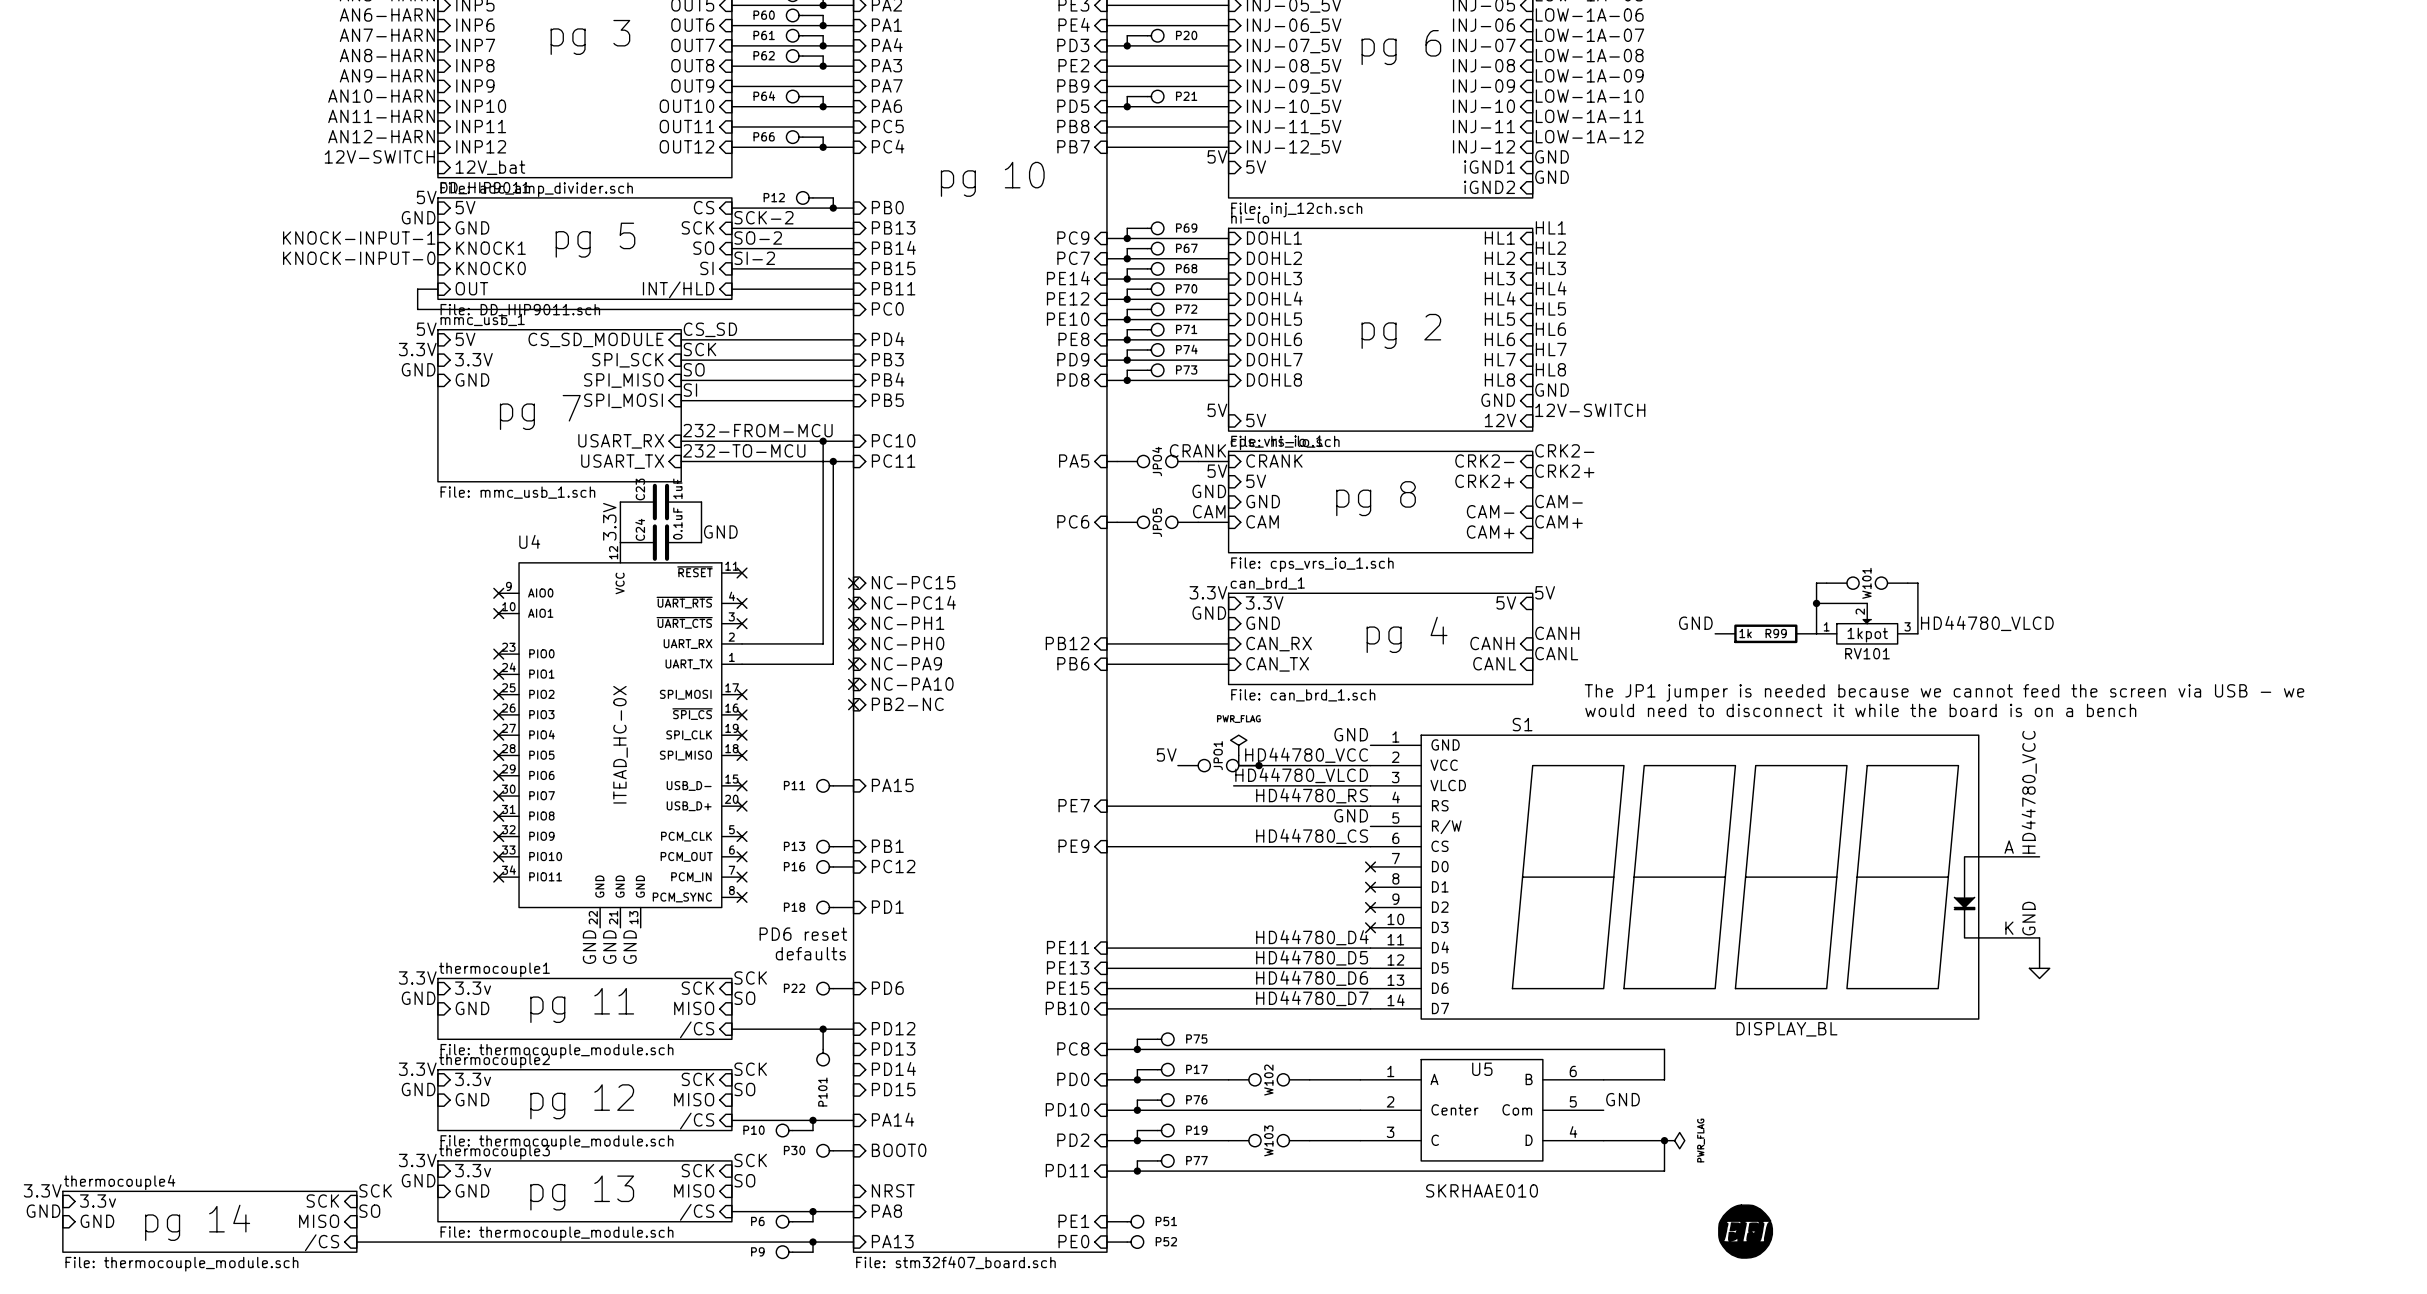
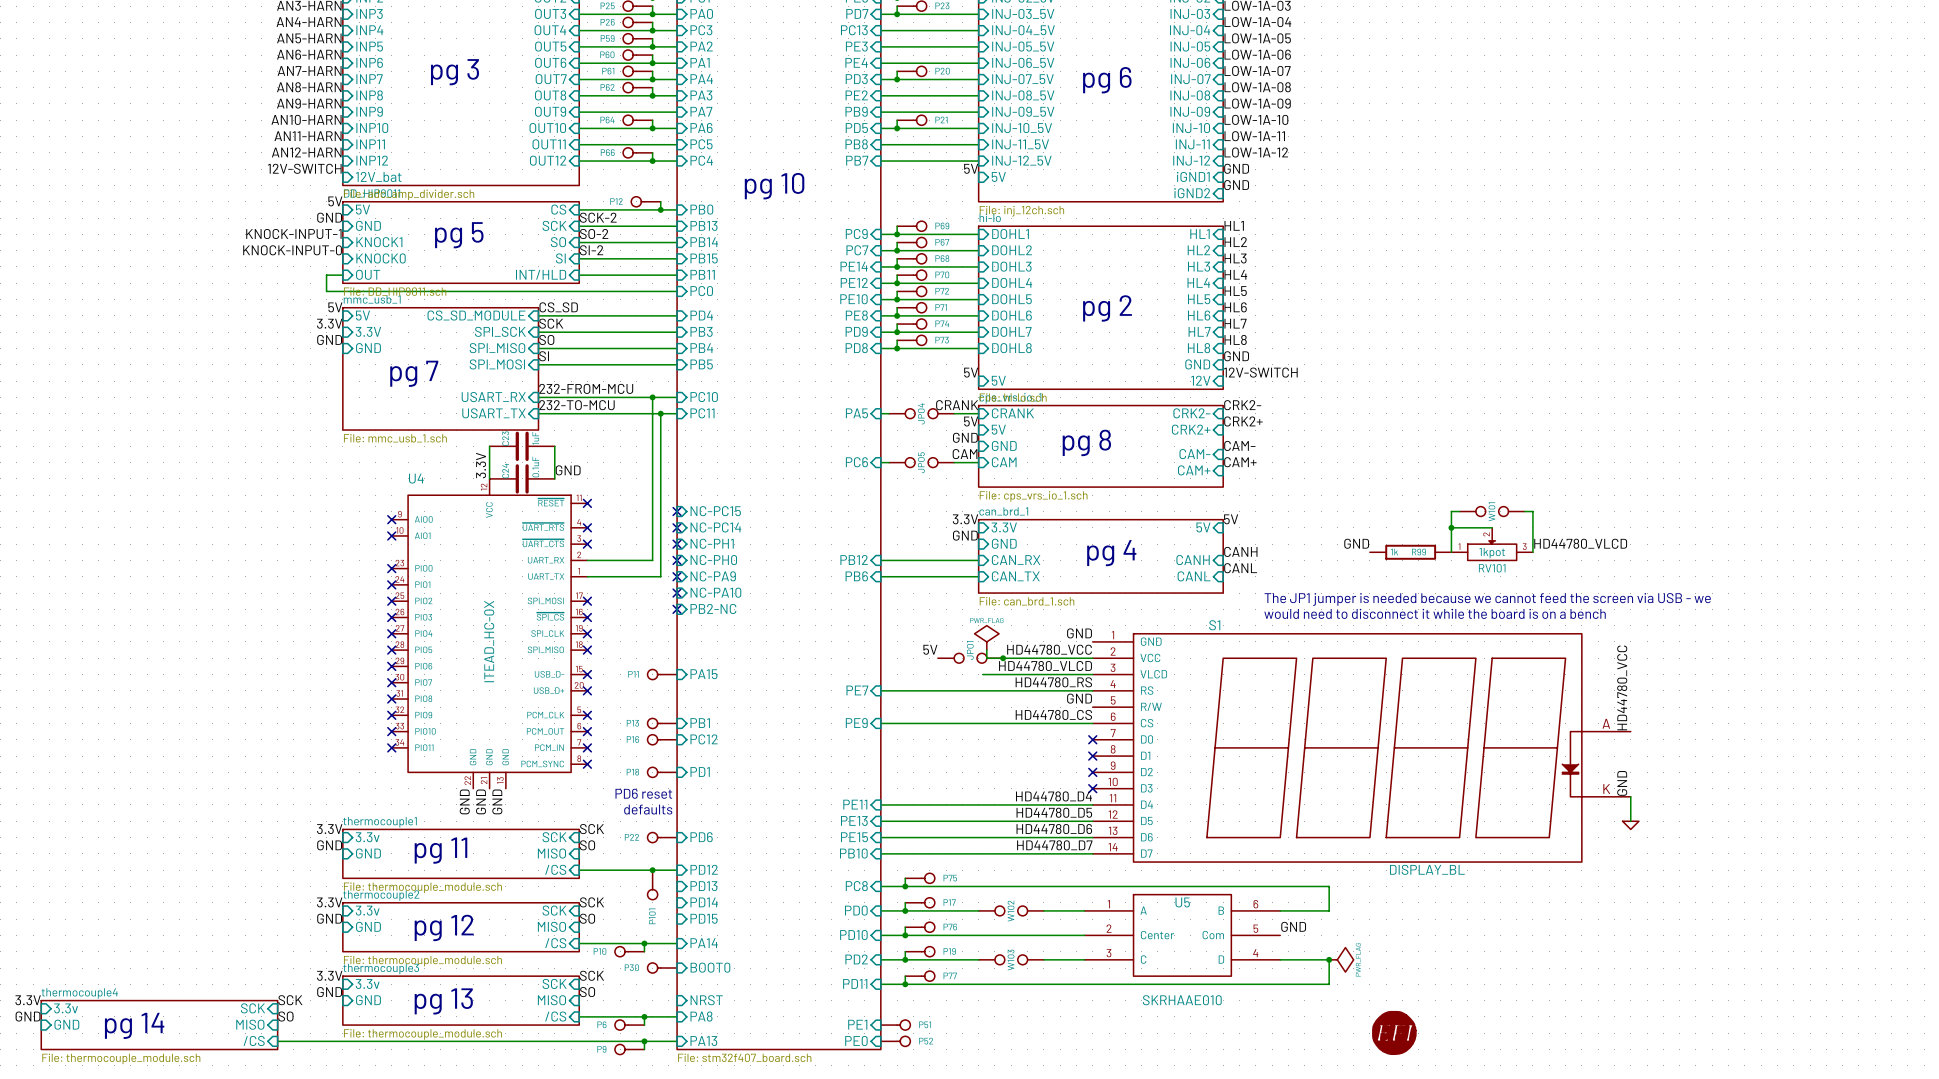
power symbol shape: [1230, 735, 1247, 756] -> [974, 625, 1000, 651]
power symbol shape: [1664, 1132, 1685, 1149] -> [1329, 947, 1354, 973]

